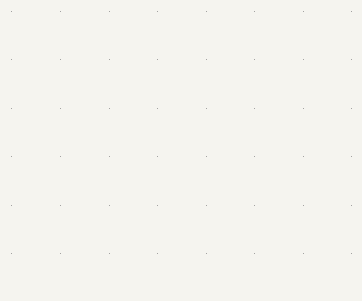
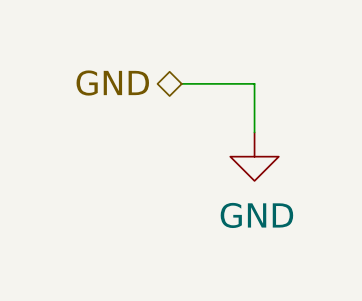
hierarchical label: none -> GND (112, 83)
wire: none -> (181, 83) (254, 83) (254, 132)
power symbol: none -> GND (254, 156)

